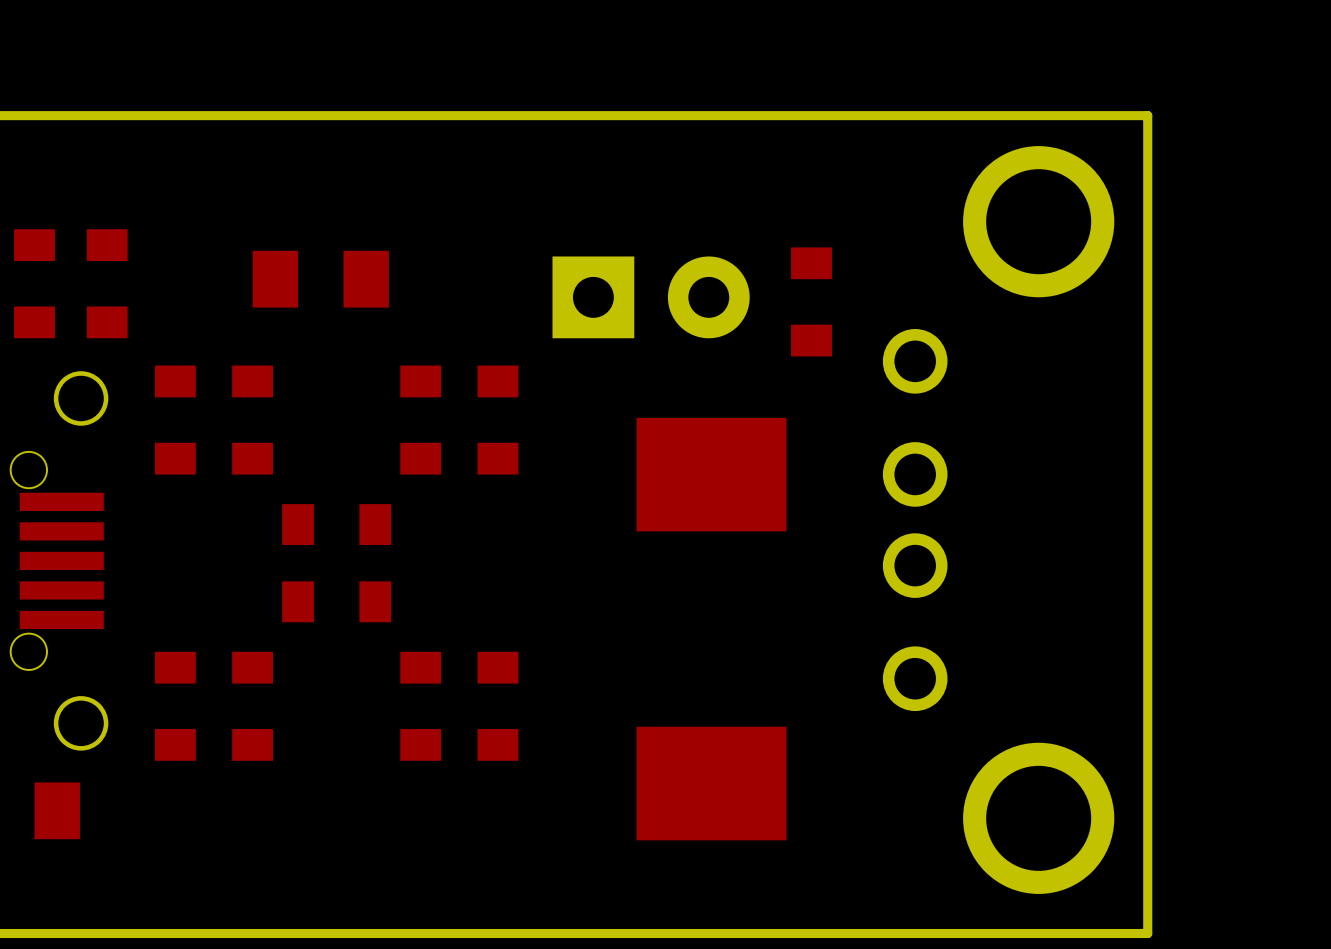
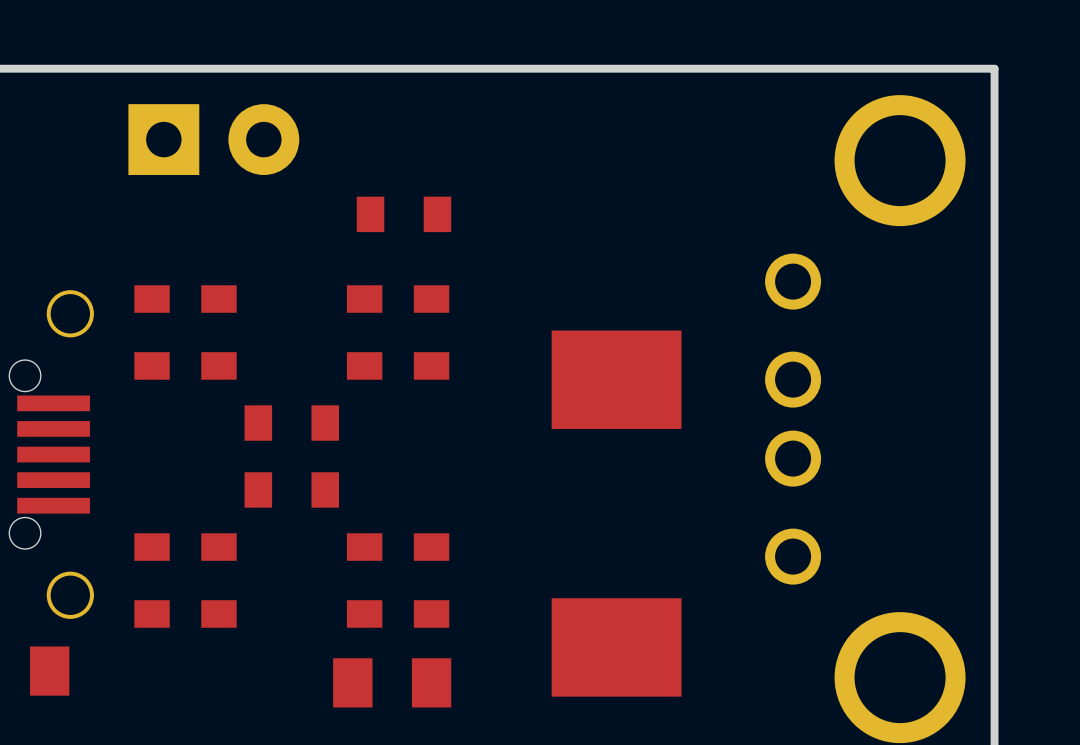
part: (320, 279) -> none
part: (34, 283) -> none
part: (107, 283) -> none
part: none -> (404, 214)
part position: (651, 297) -> (213, 139)
part: (811, 301) -> none
part: none -> (392, 682)

